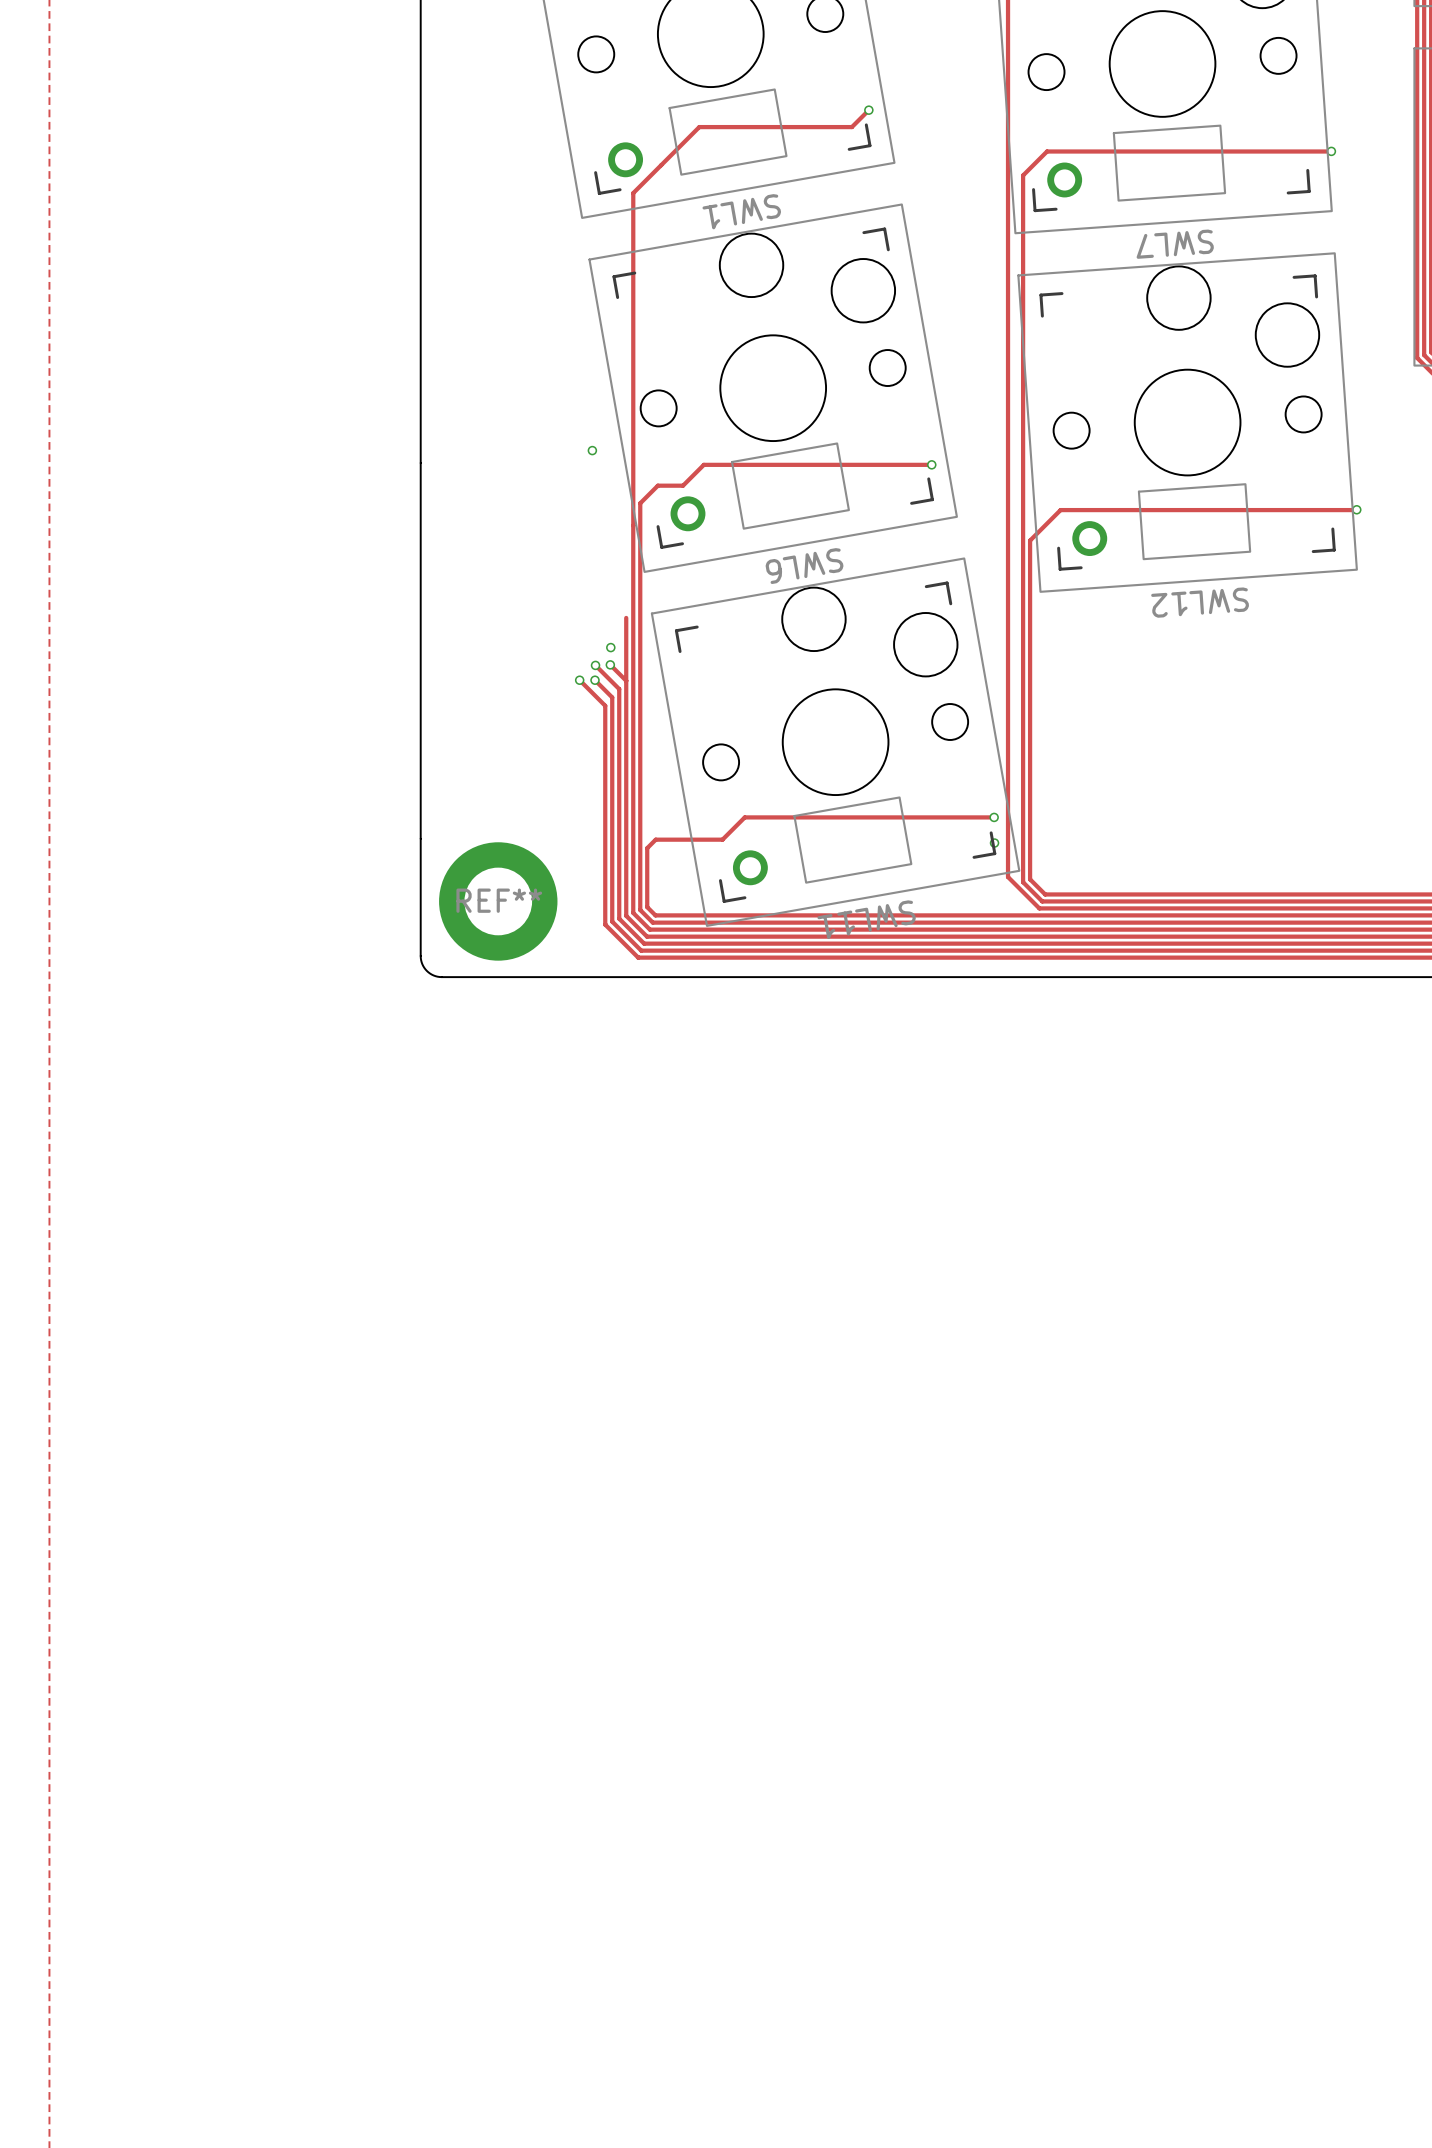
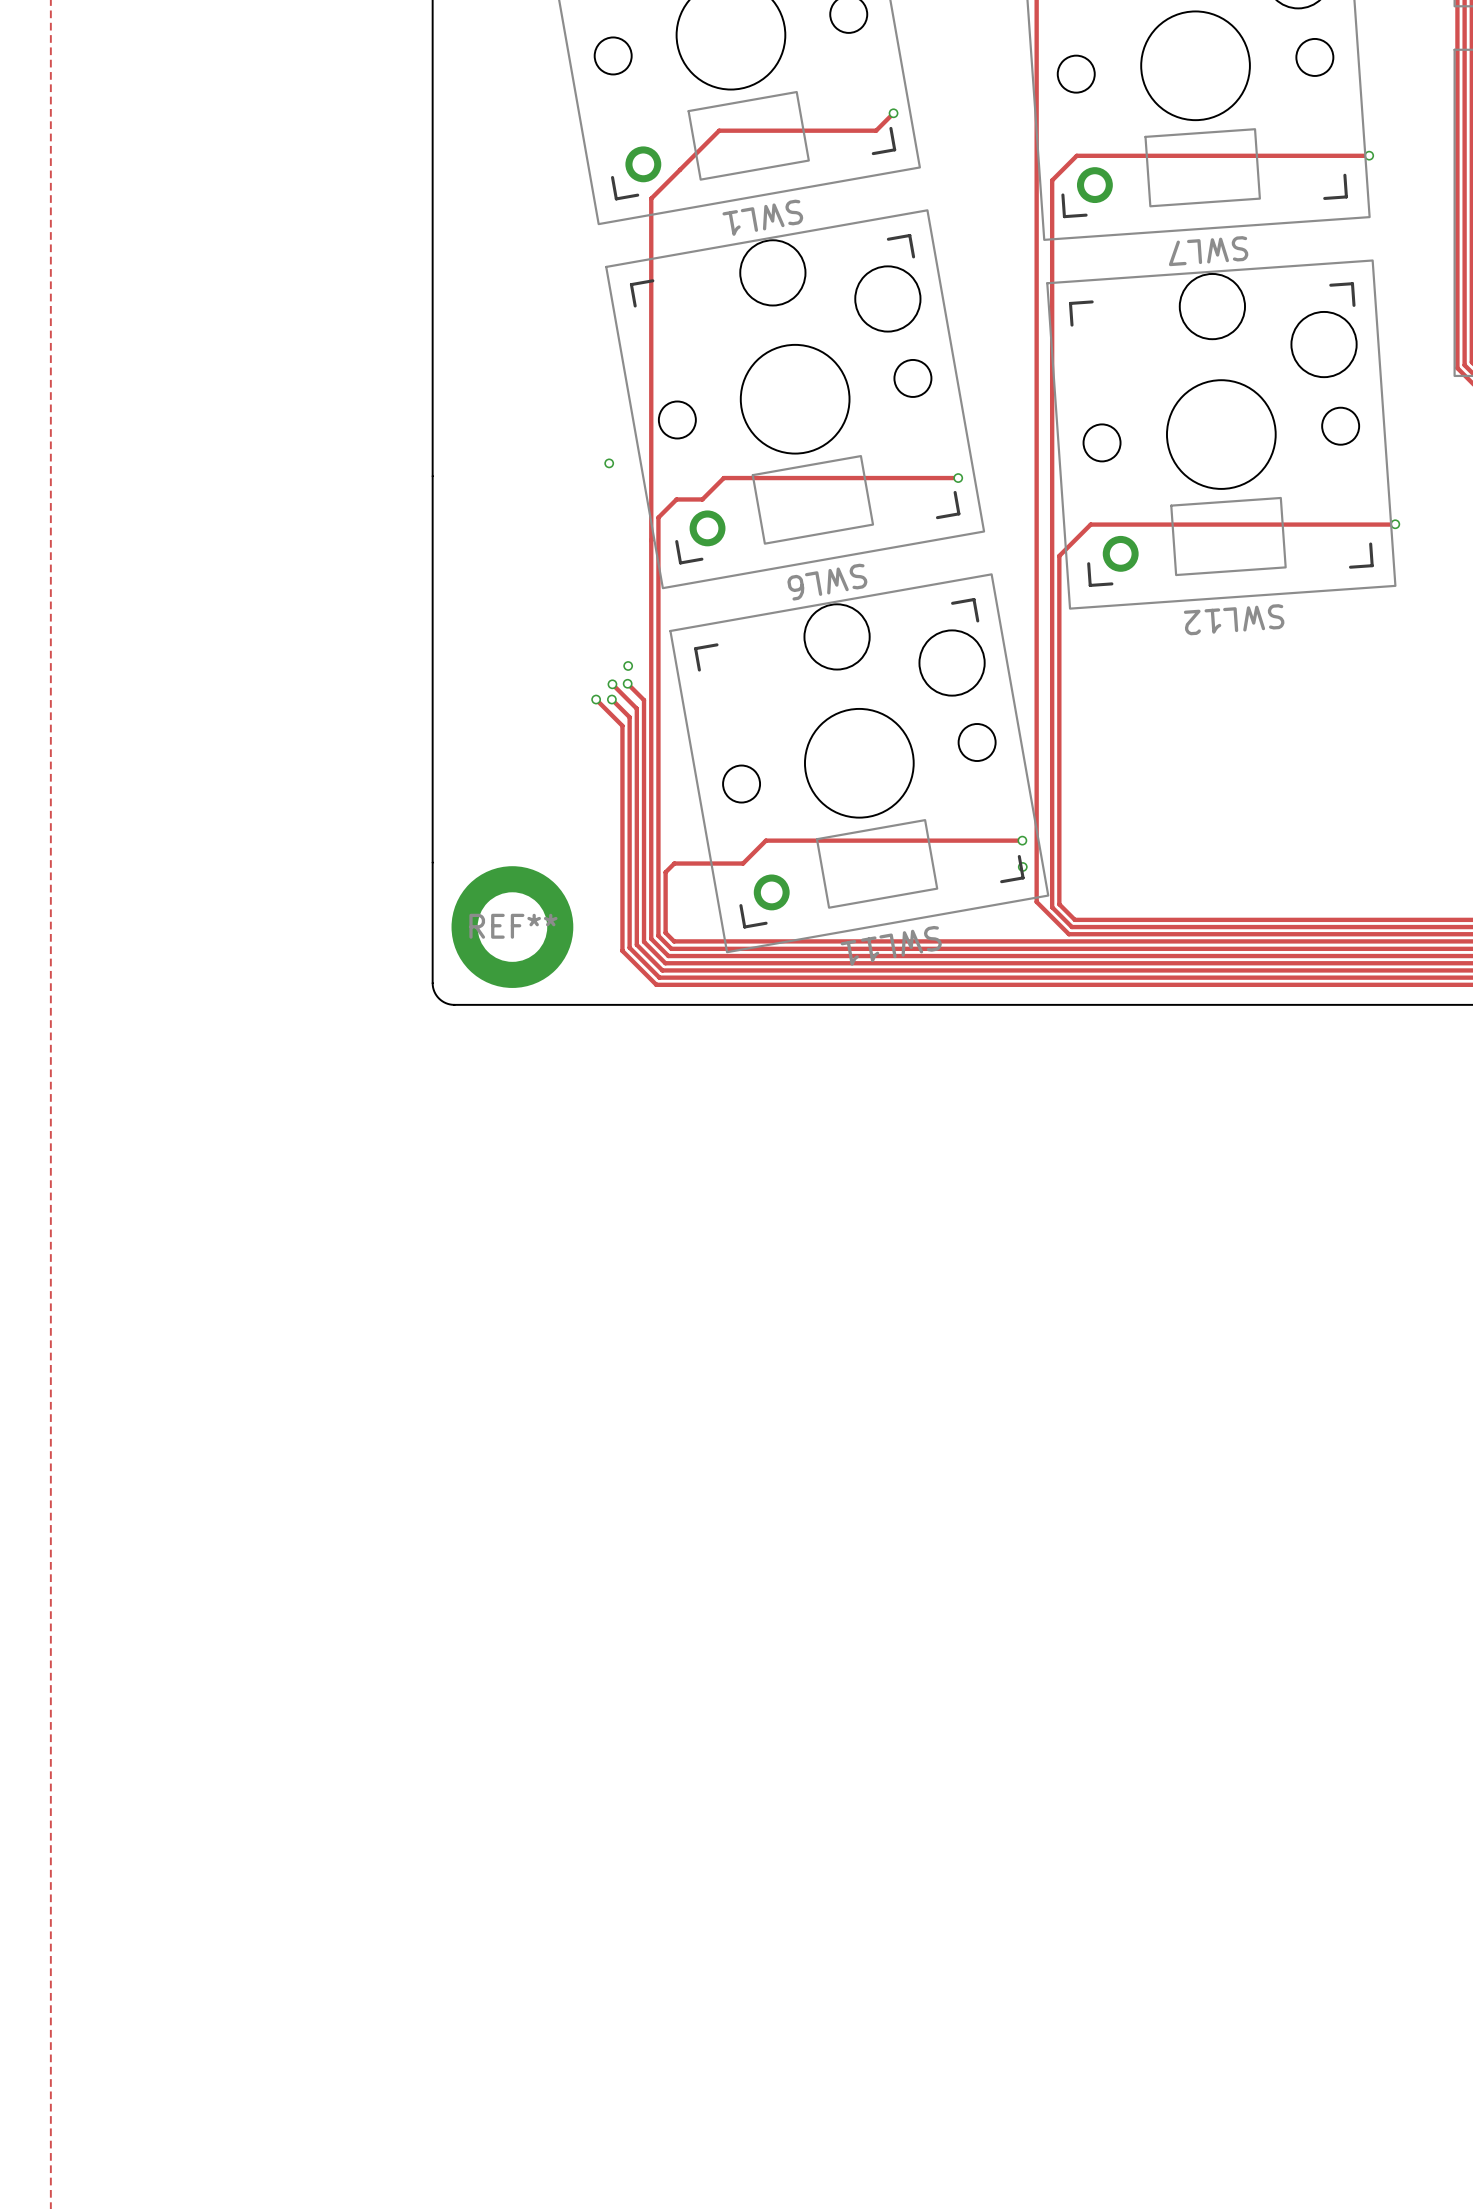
track: (626, 617) (626, 680) -> none

